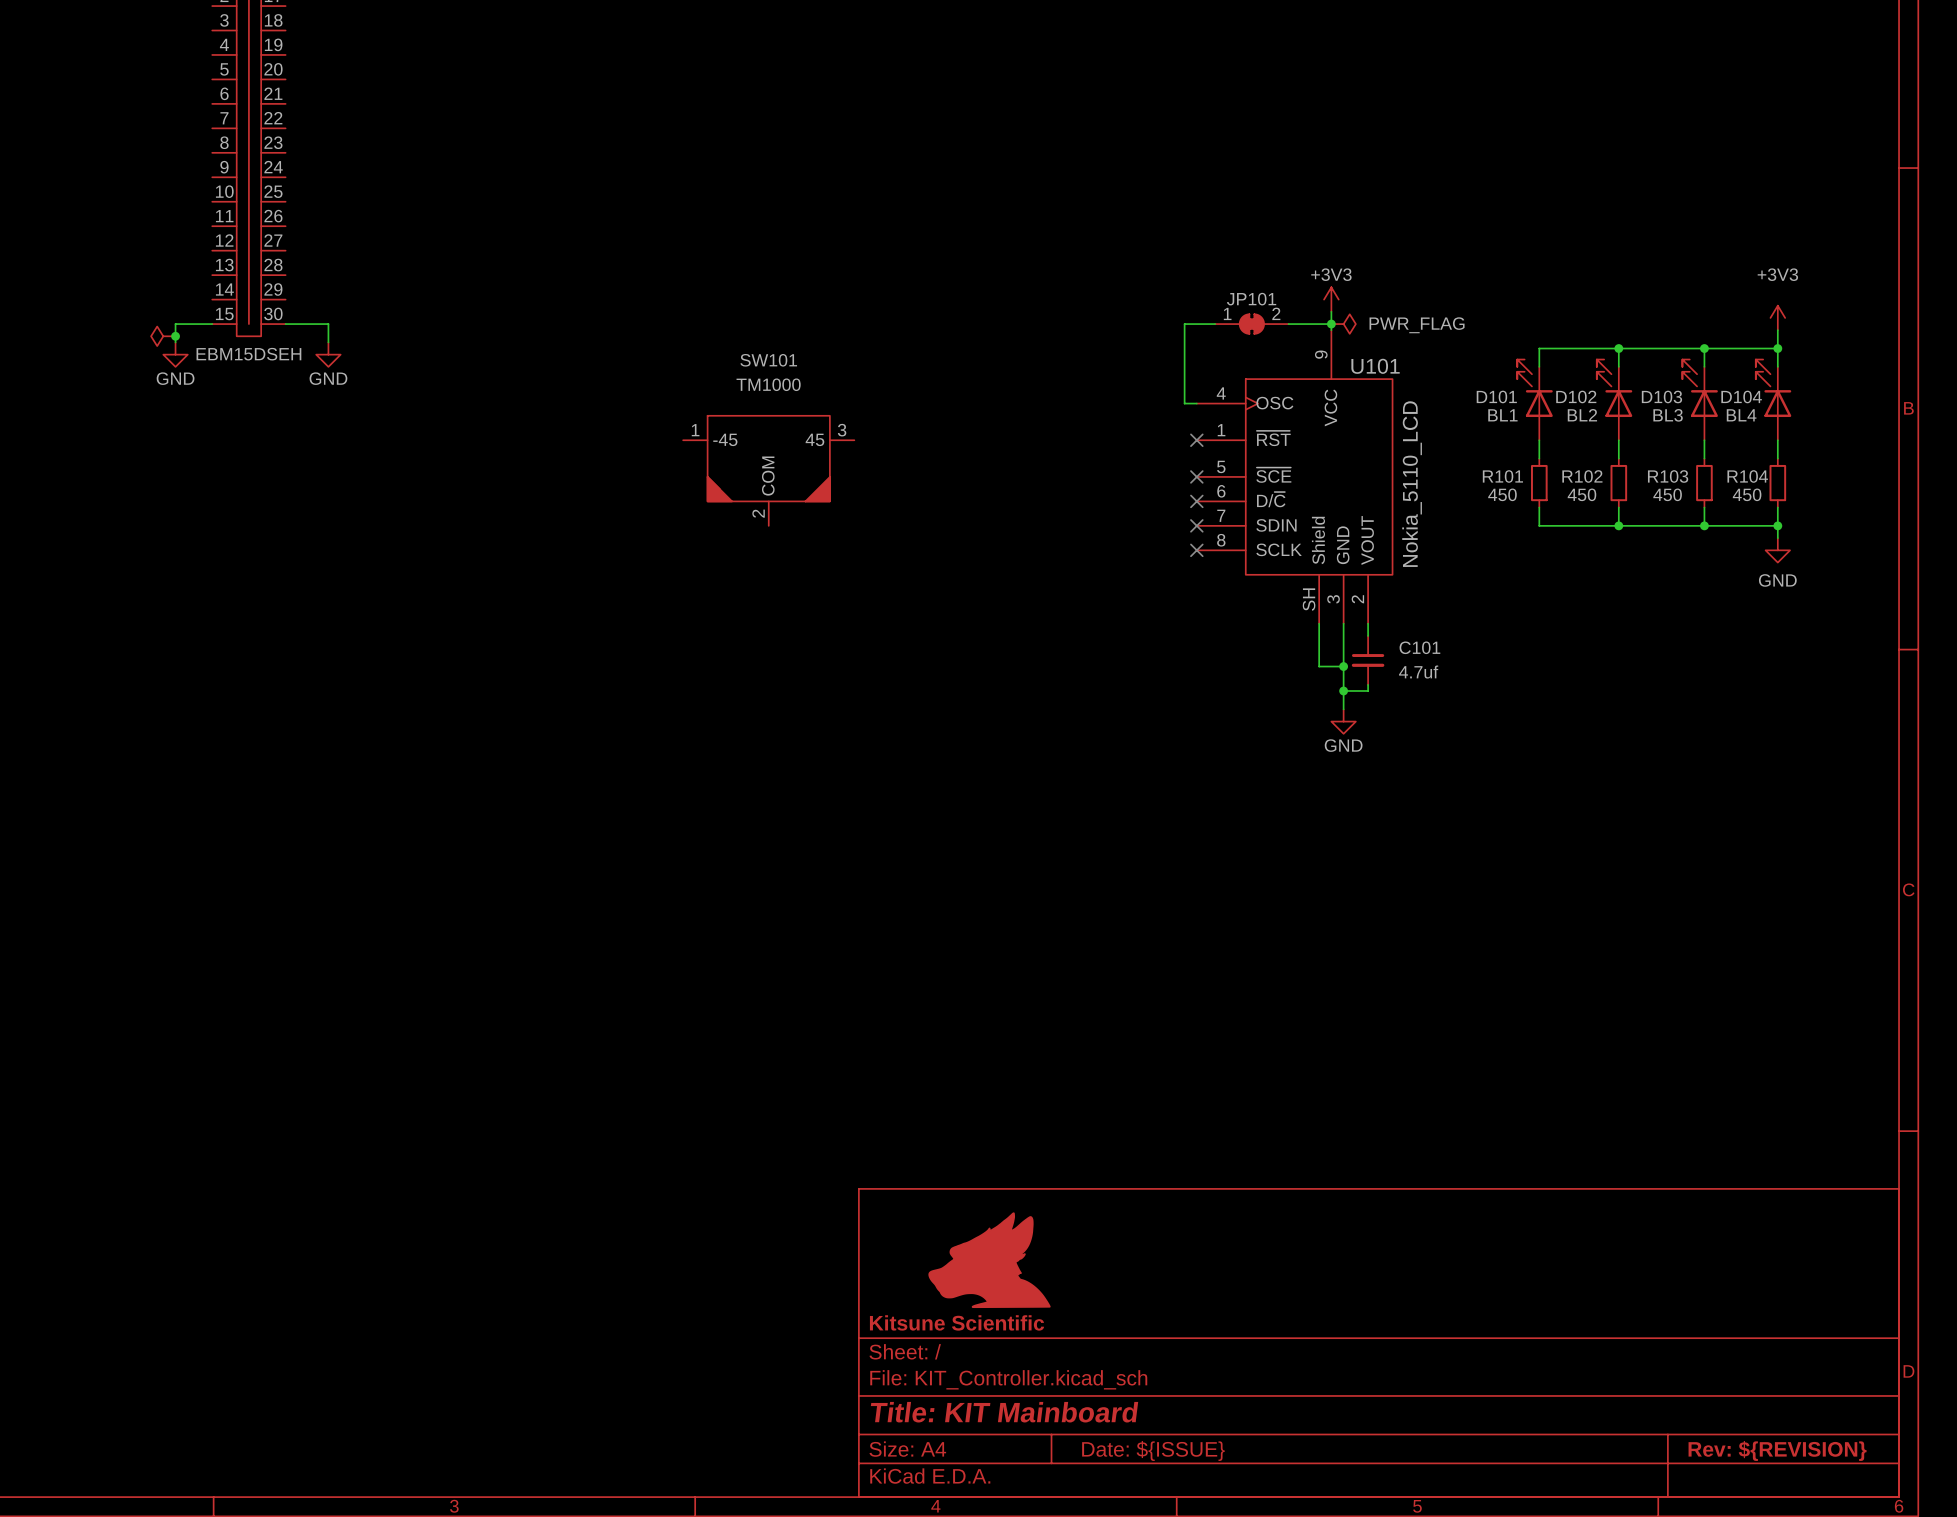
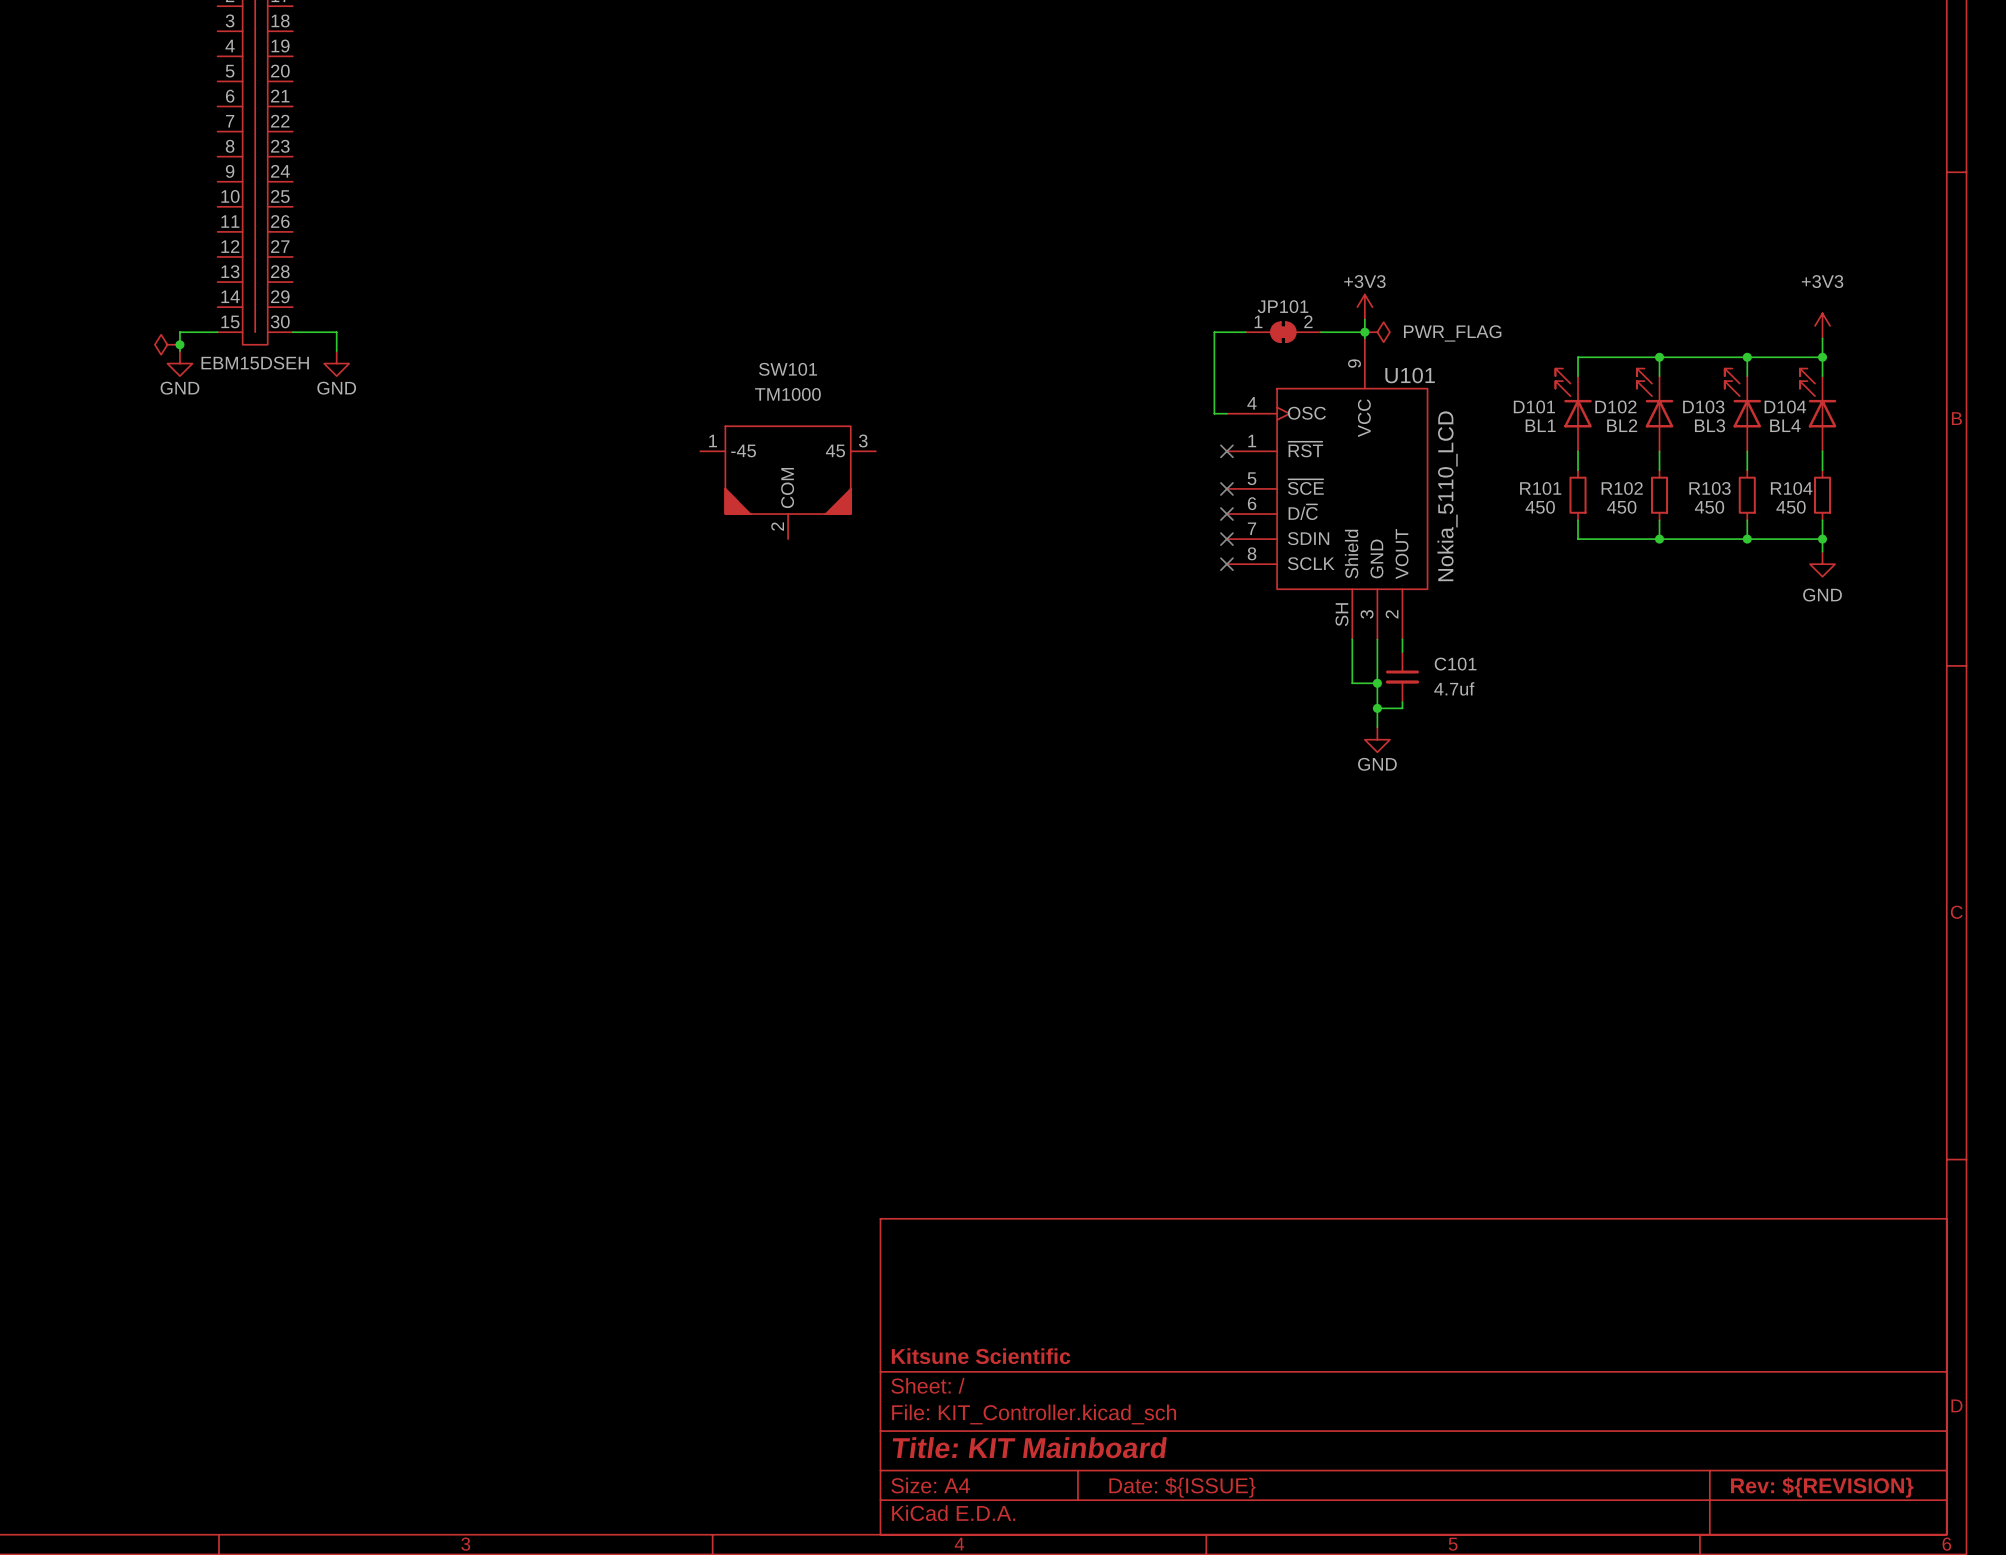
power symbol: (989, 1260) -> none

